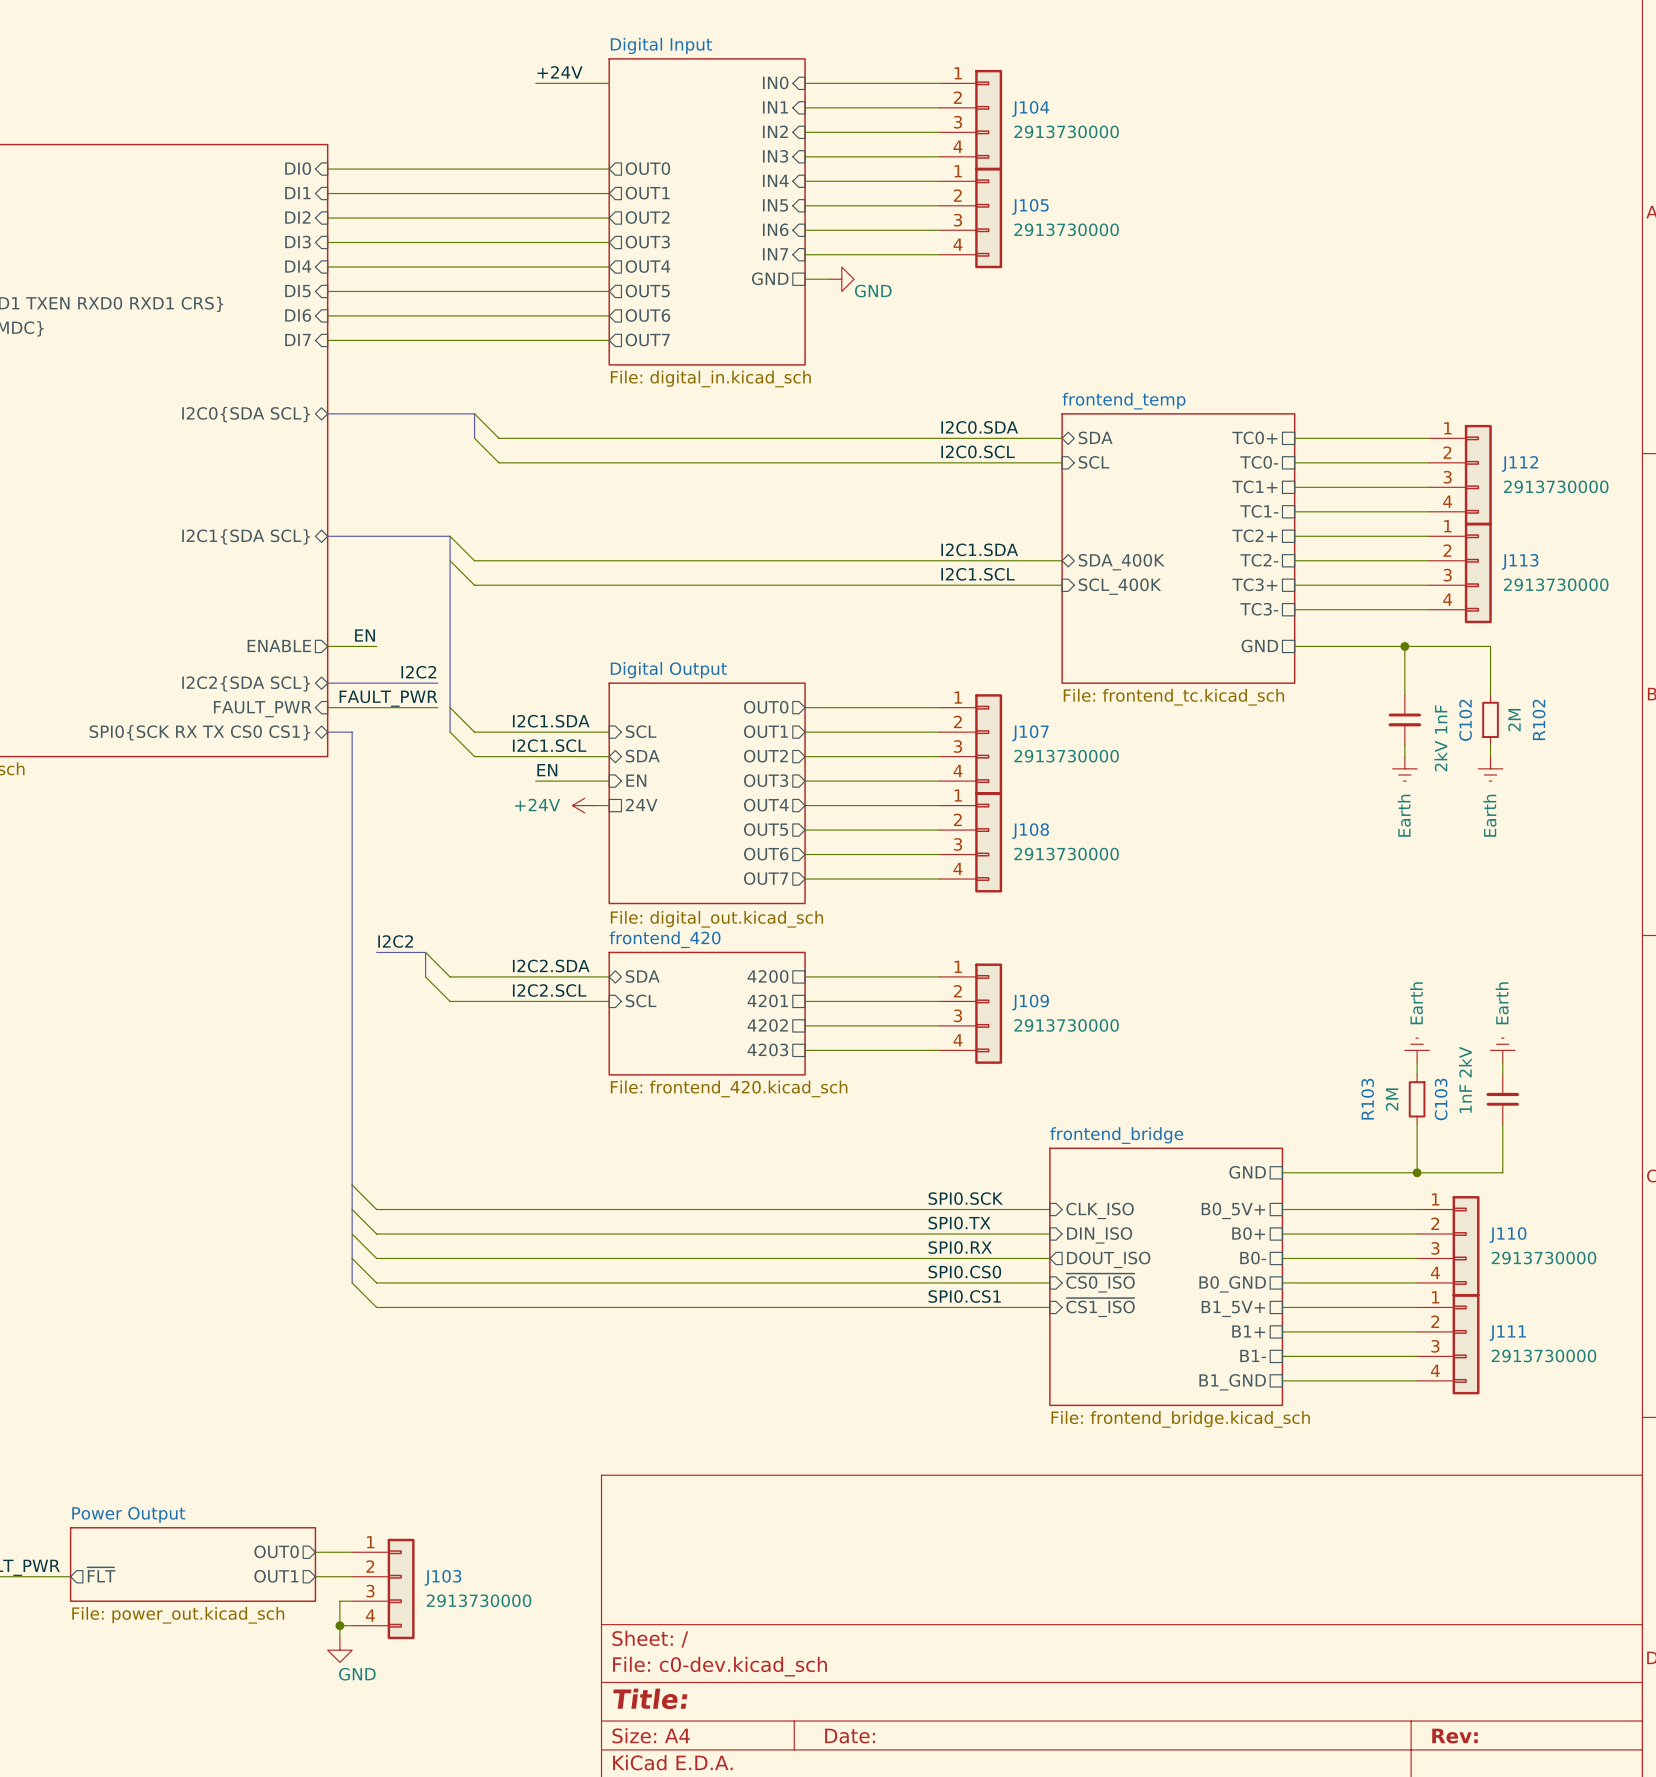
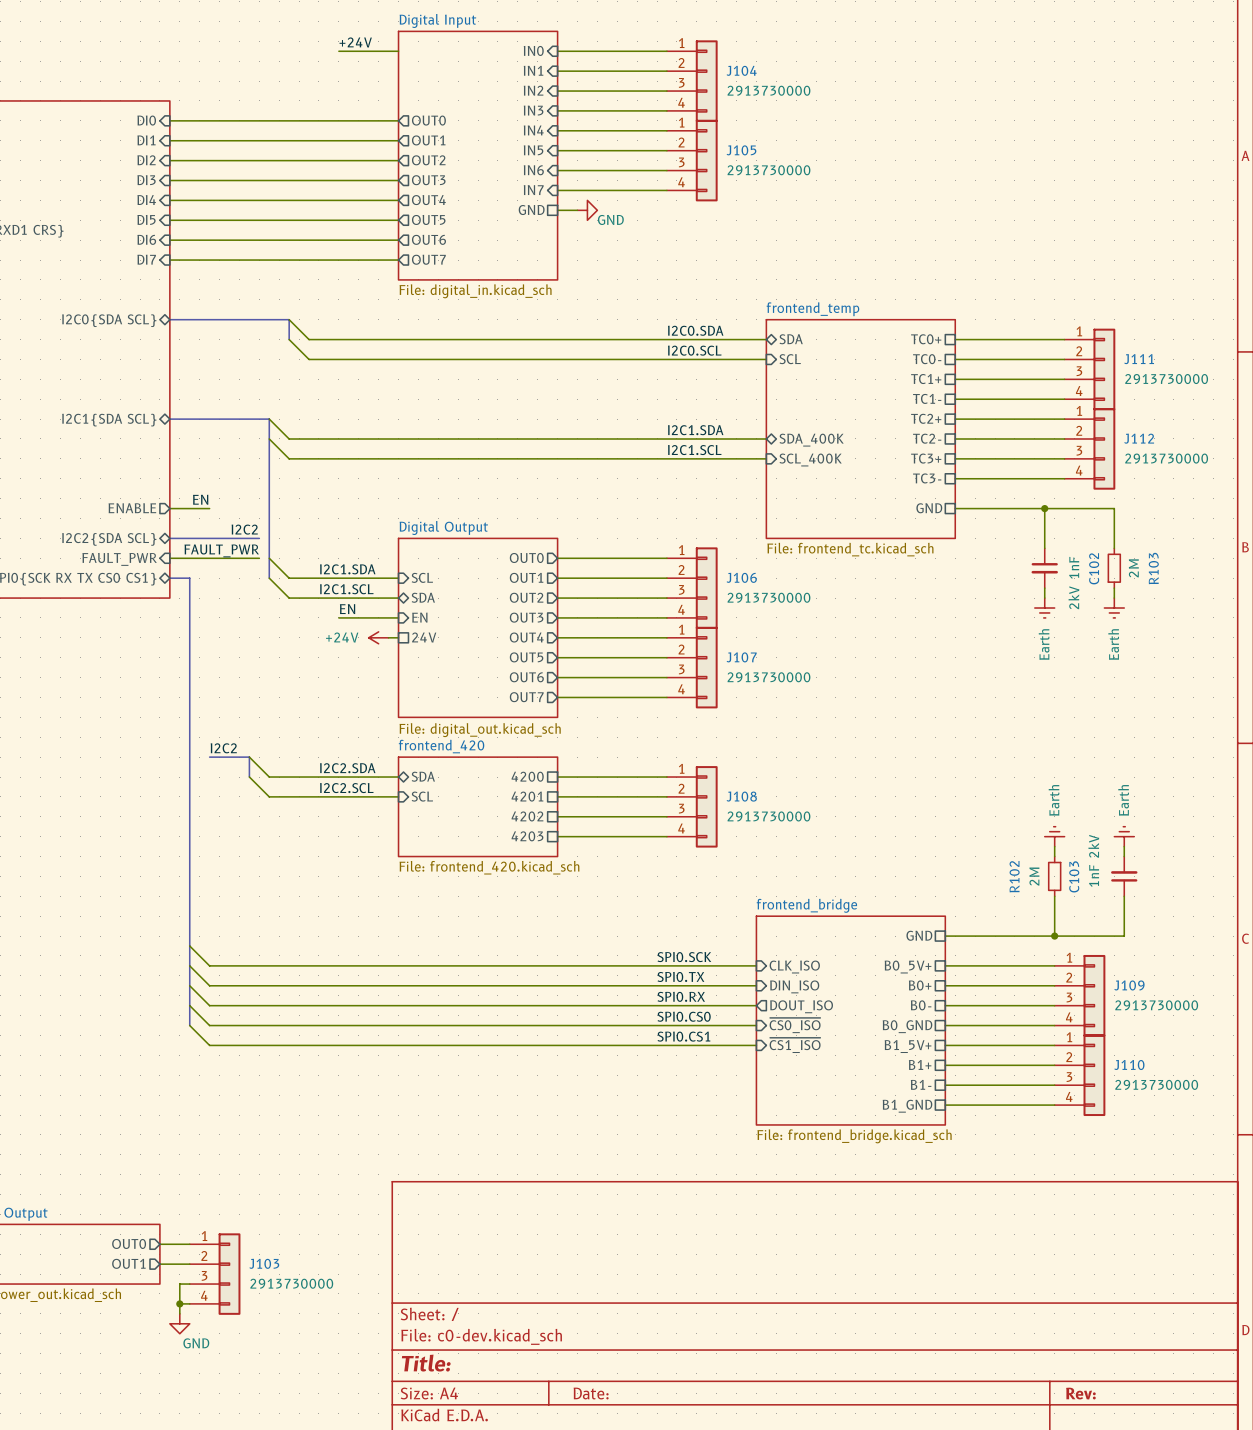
J112 name: J112 (1520, 463) -> J111 (1139, 359)
J113 name: J113 (1520, 561) -> J112 (1139, 438)
R102 name: R102 (1539, 719) -> R103 (1153, 568)
J107 name: J107 (1030, 733) -> J106 (741, 577)
J108 name: J108 (1030, 831) -> J107 (741, 657)
J109 name: J109 (1030, 1002) -> J108 (741, 796)
R103 name: R103 (1367, 1099) -> R102 (1014, 876)
J110 name: J110 (1508, 1235) -> J109 (1129, 985)
J111 name: J111 (1507, 1333) -> J110 (1129, 1065)

